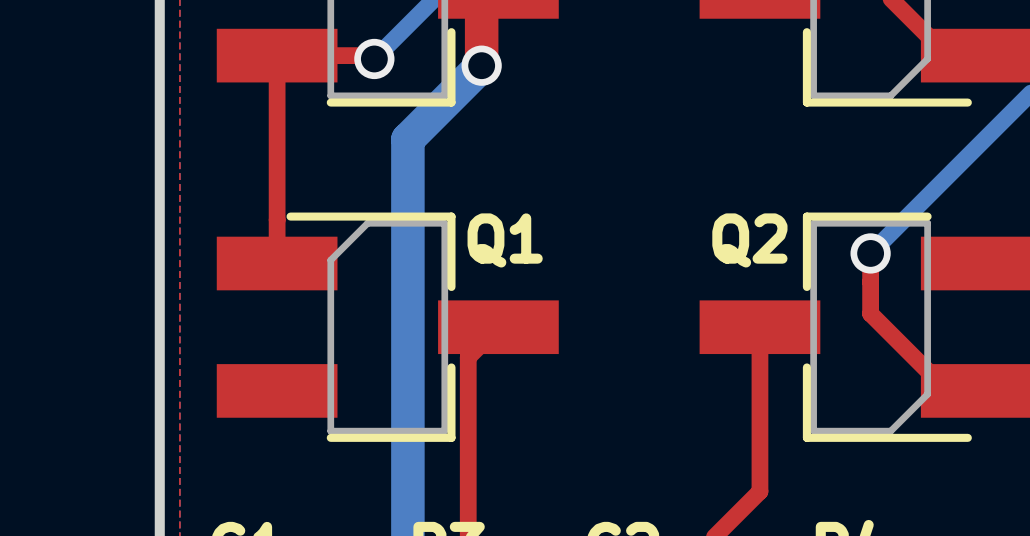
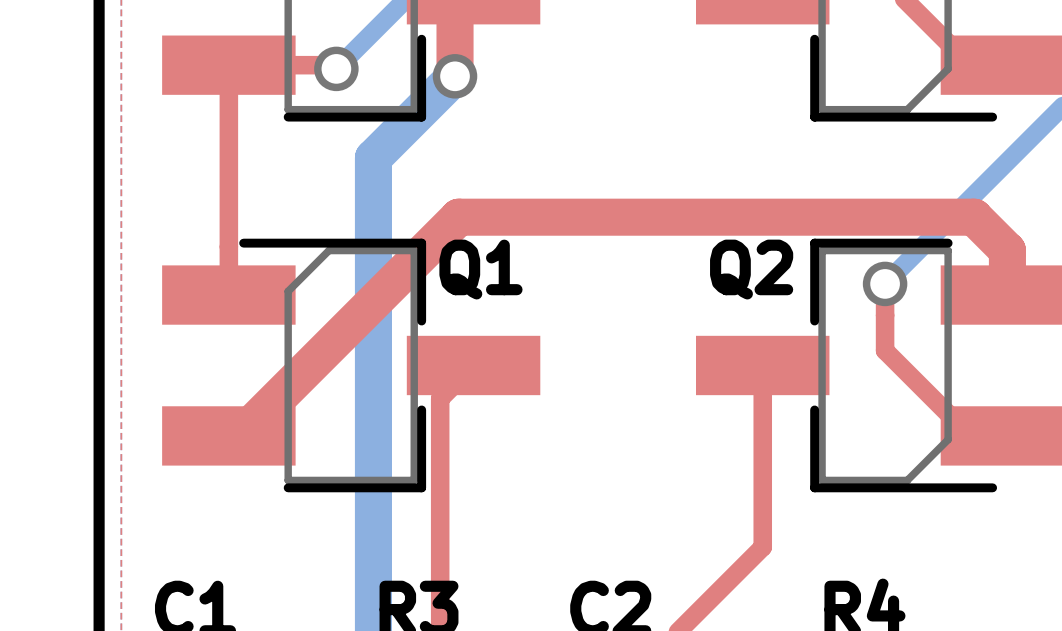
top track: none -> (1007, 295) (1007, 250) (974, 217) (458, 217) (239, 435)

